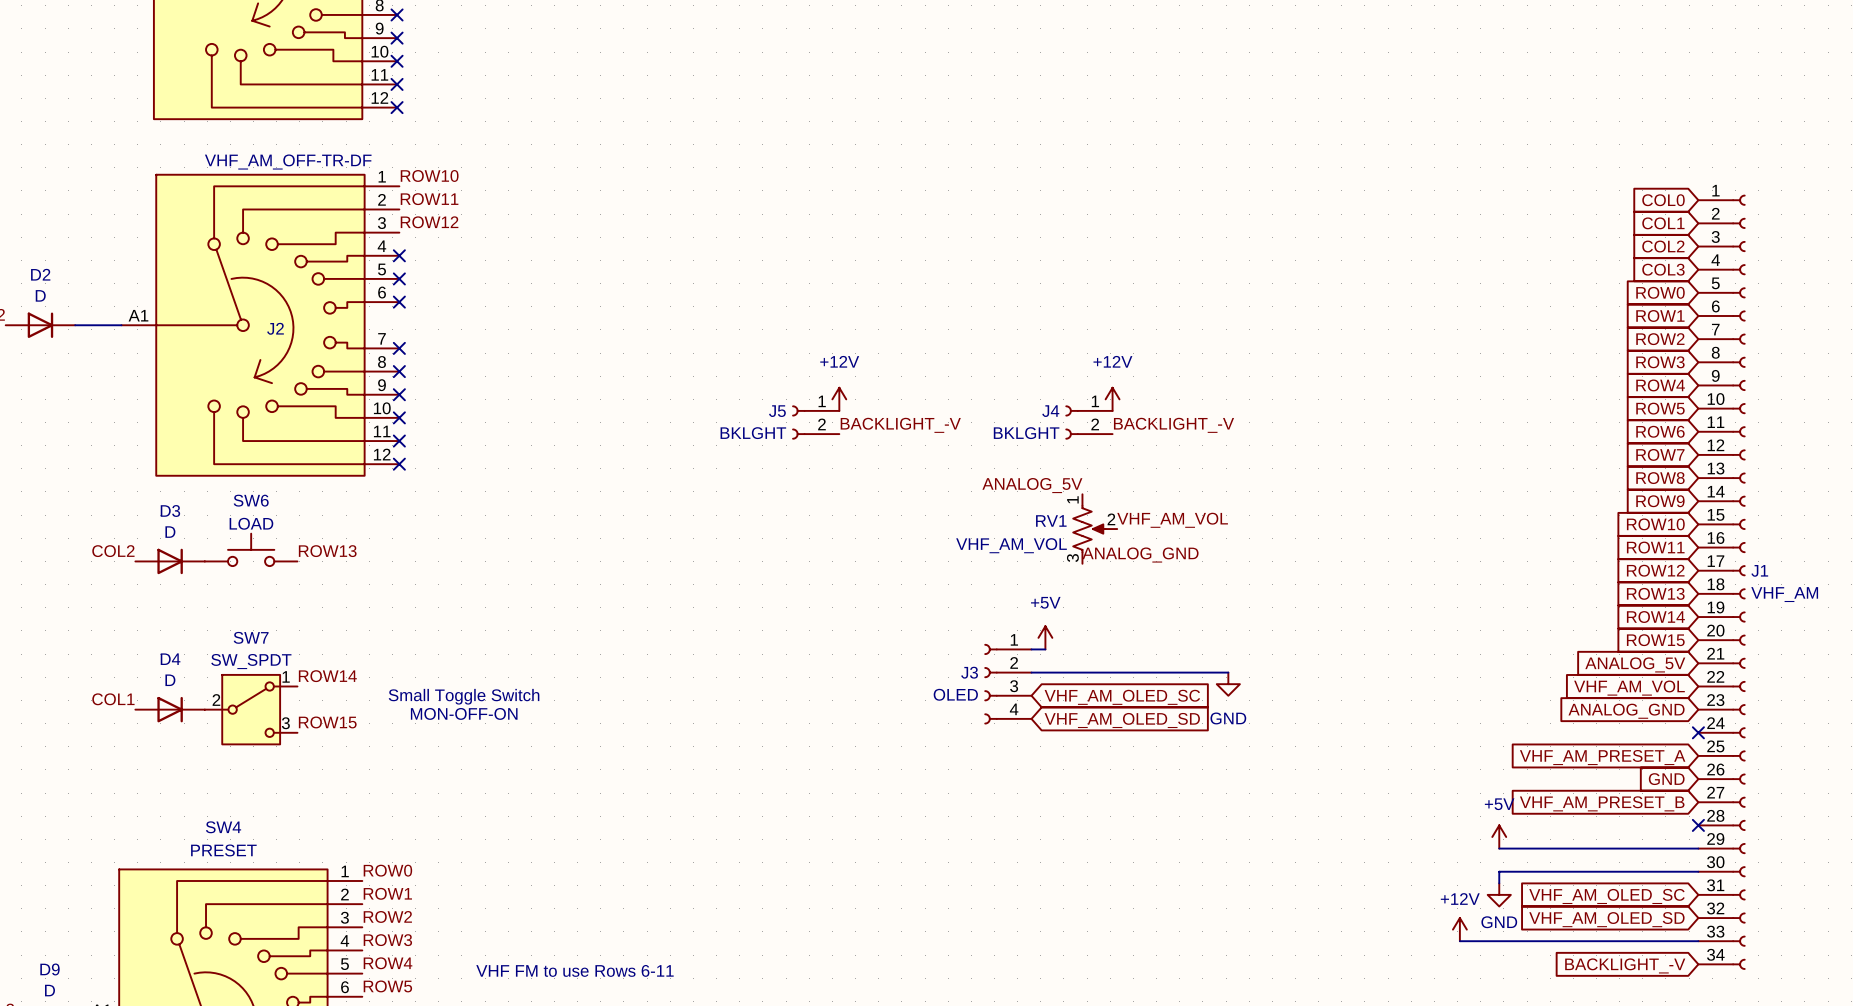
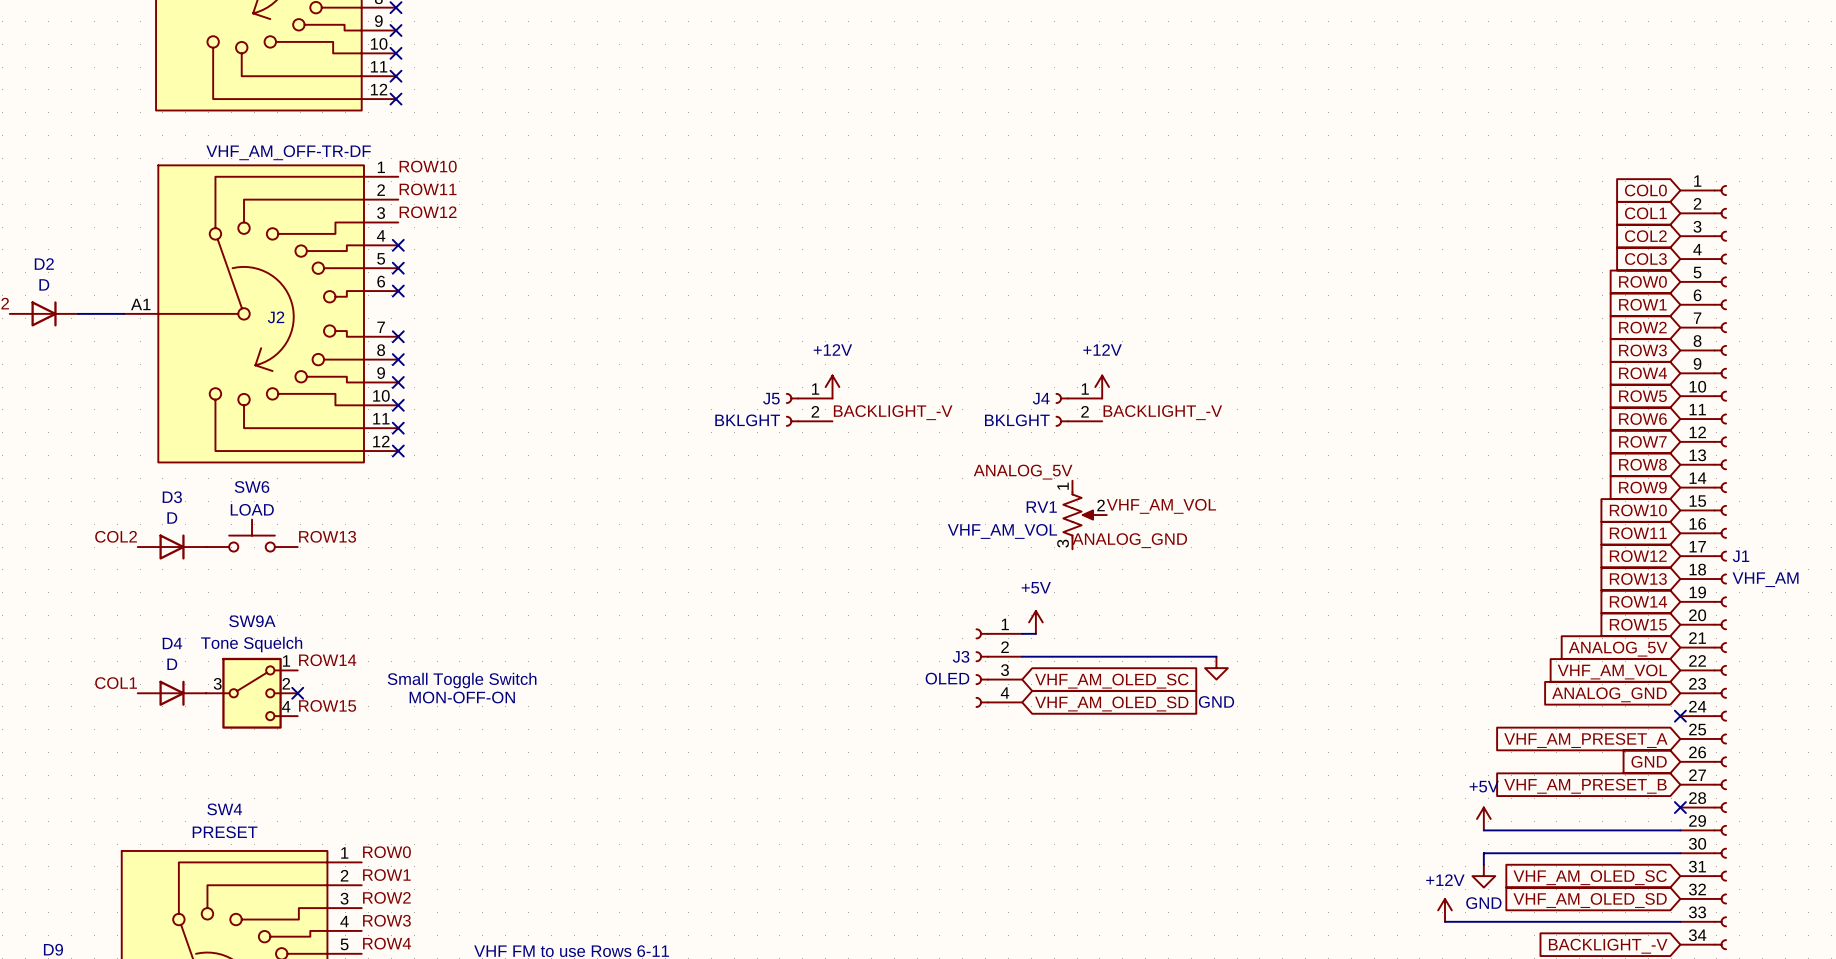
SW7: SW_SPDT (251, 709) -> none
SW9A: none -> Tone Squelch (252, 693)
no-connect mark: none -> (297, 693)

